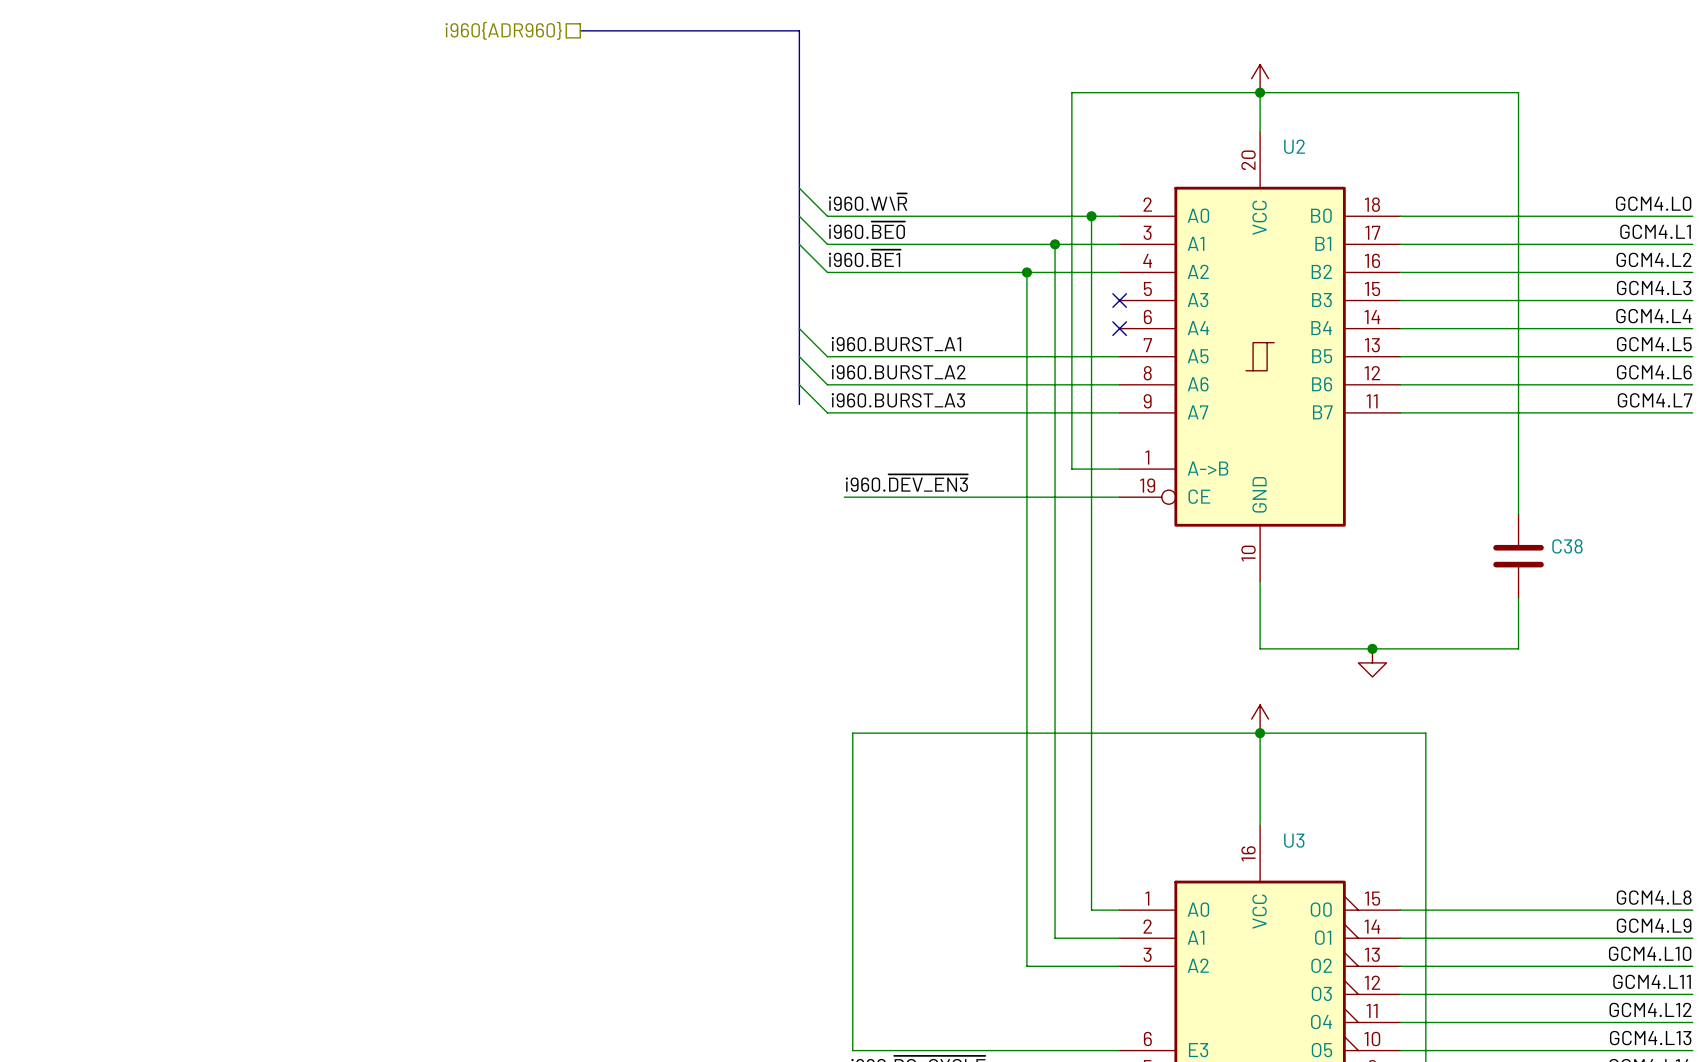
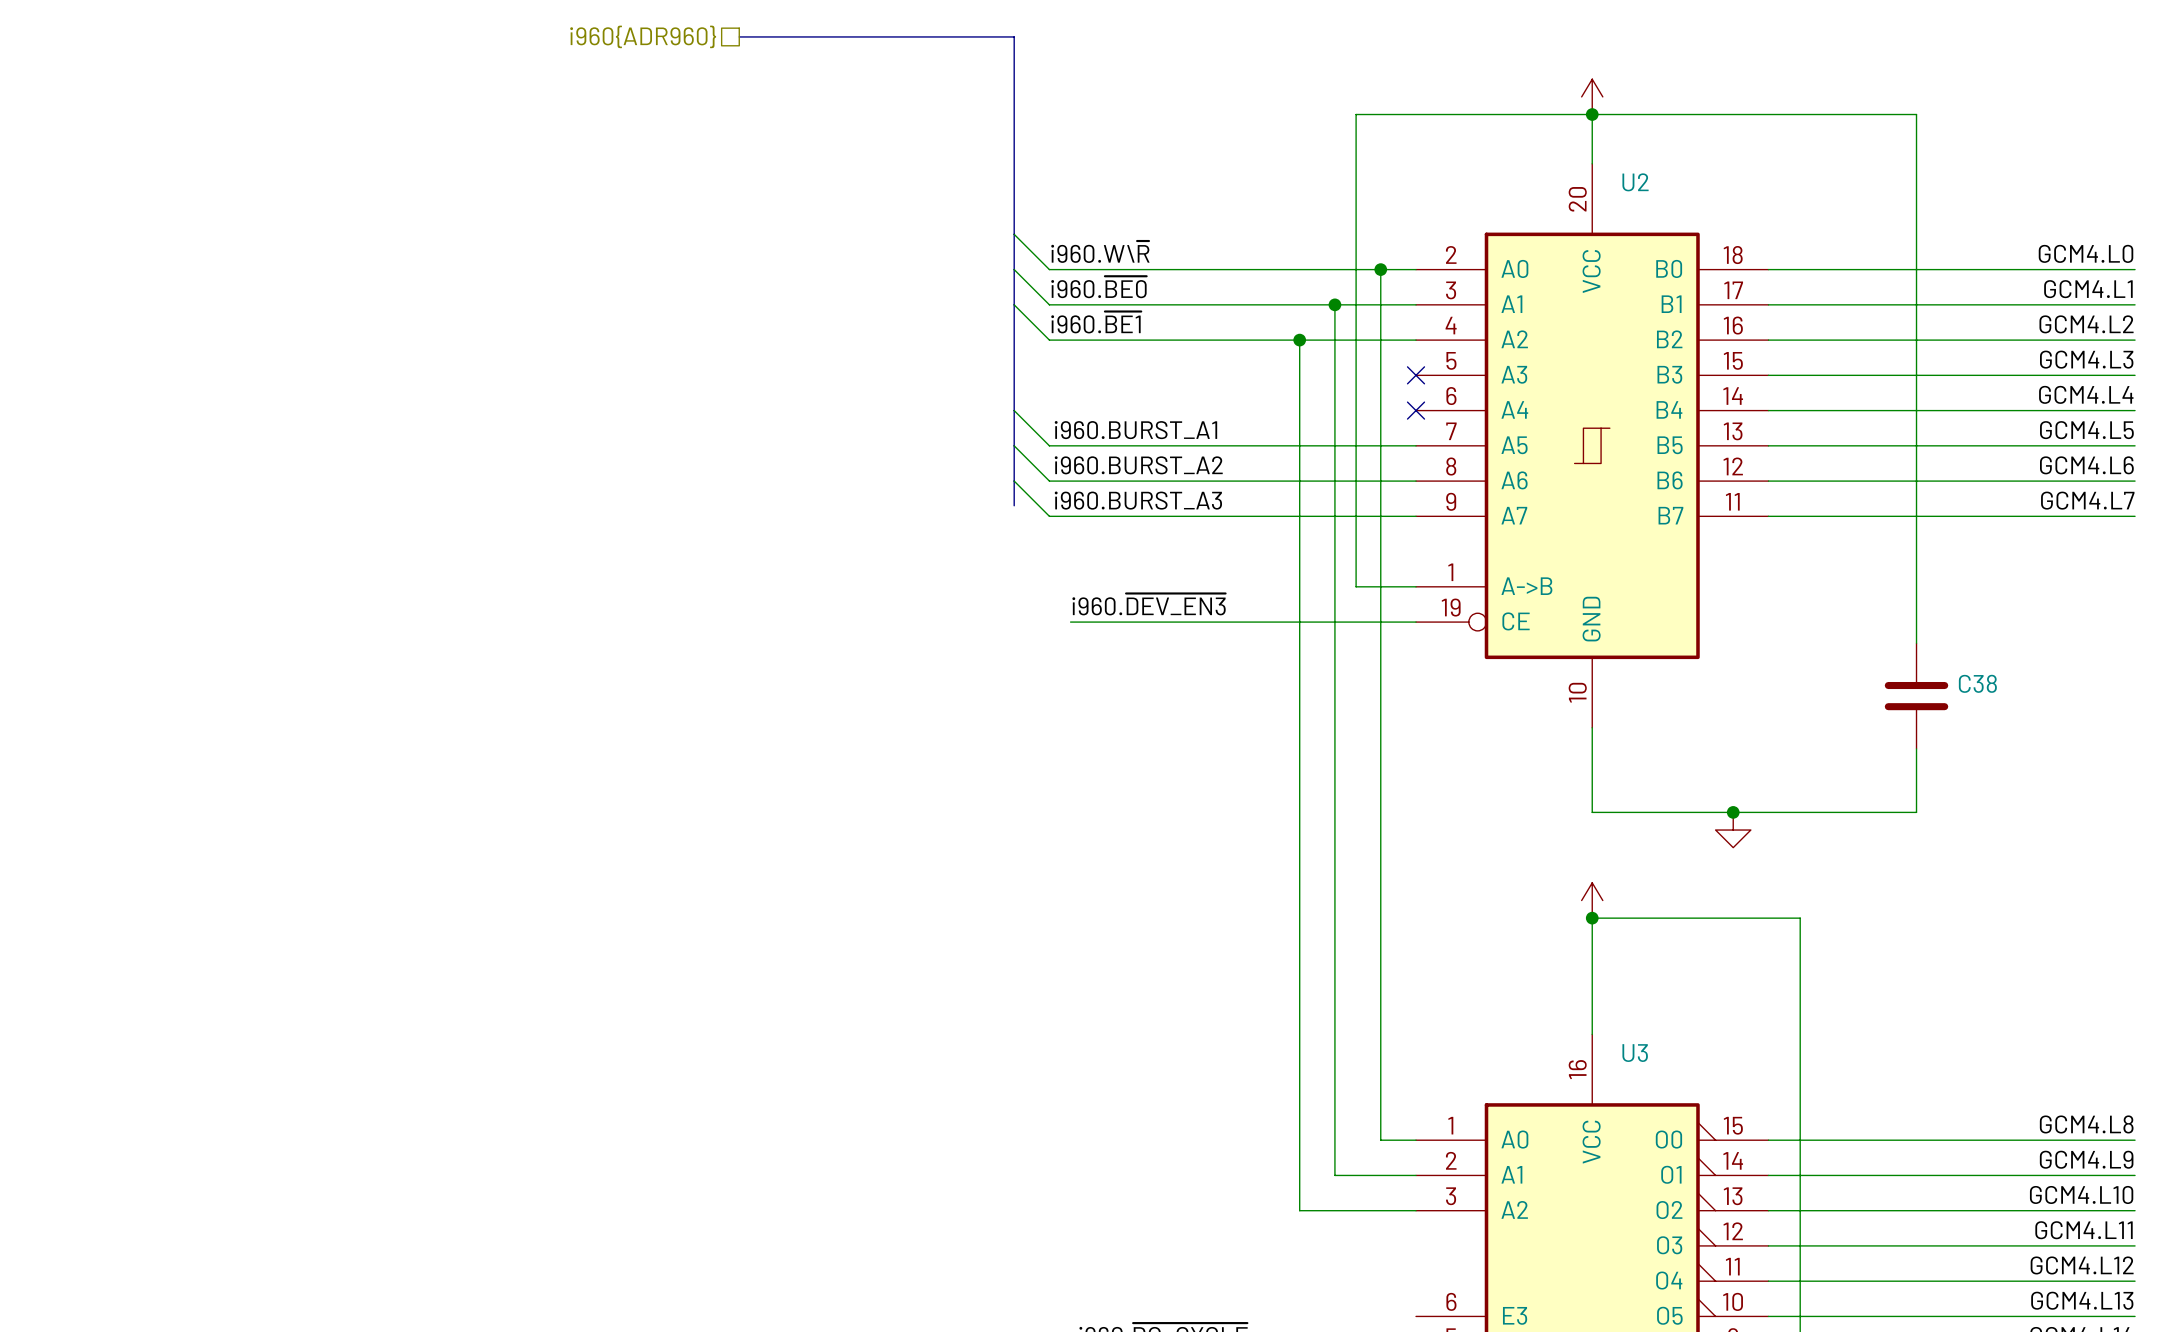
wire: (1260, 733) (852, 733) (852, 1050) (1119, 1050) -> none

